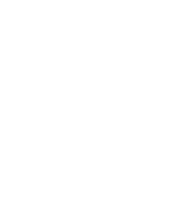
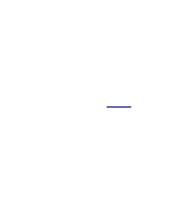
line: none -> (107, 107) (130, 107)

